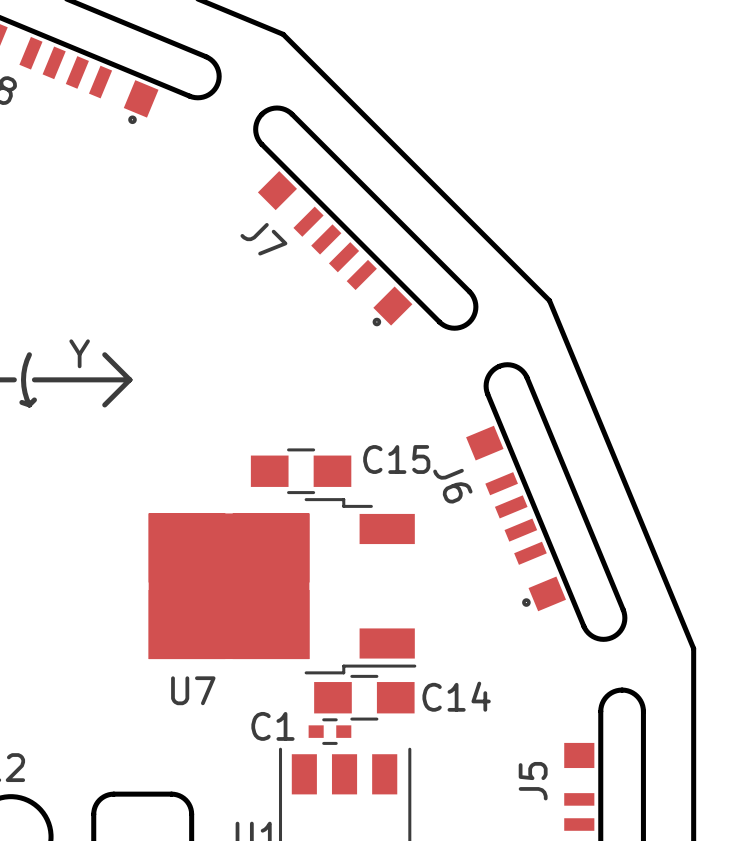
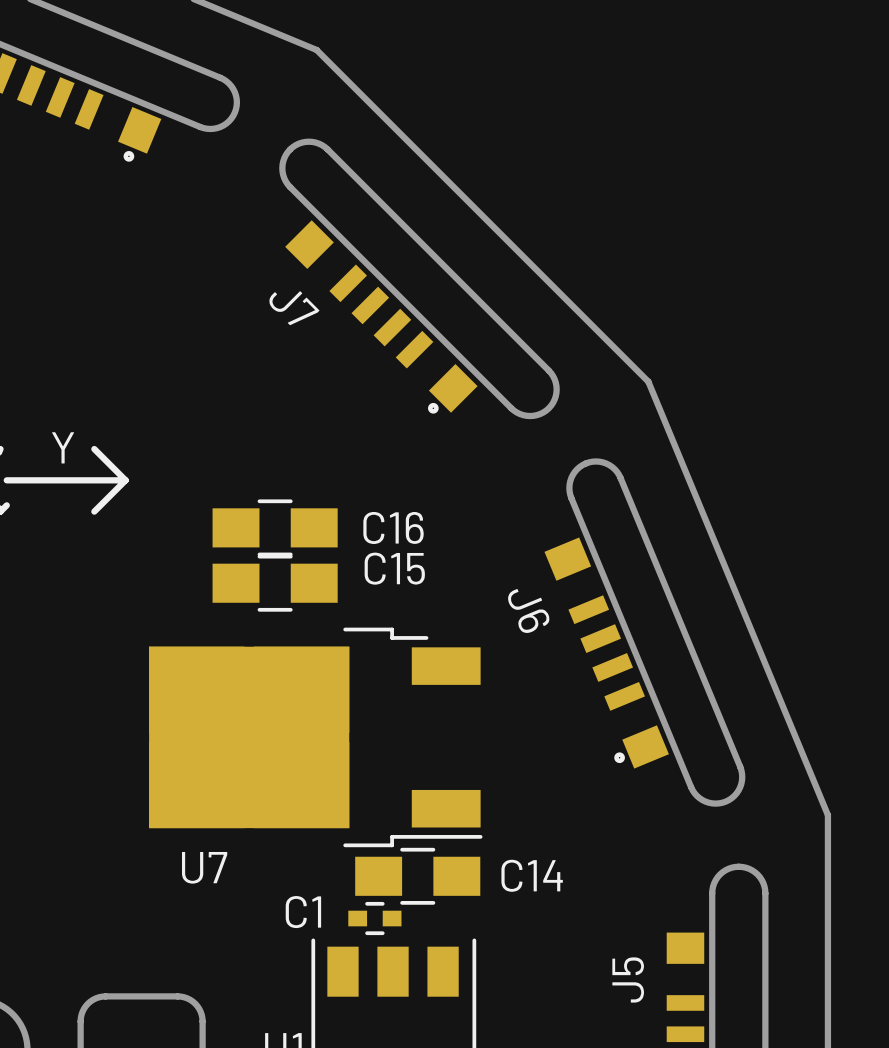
C16: none -> (275, 527)
C15 position: (301, 471) -> (275, 583)

